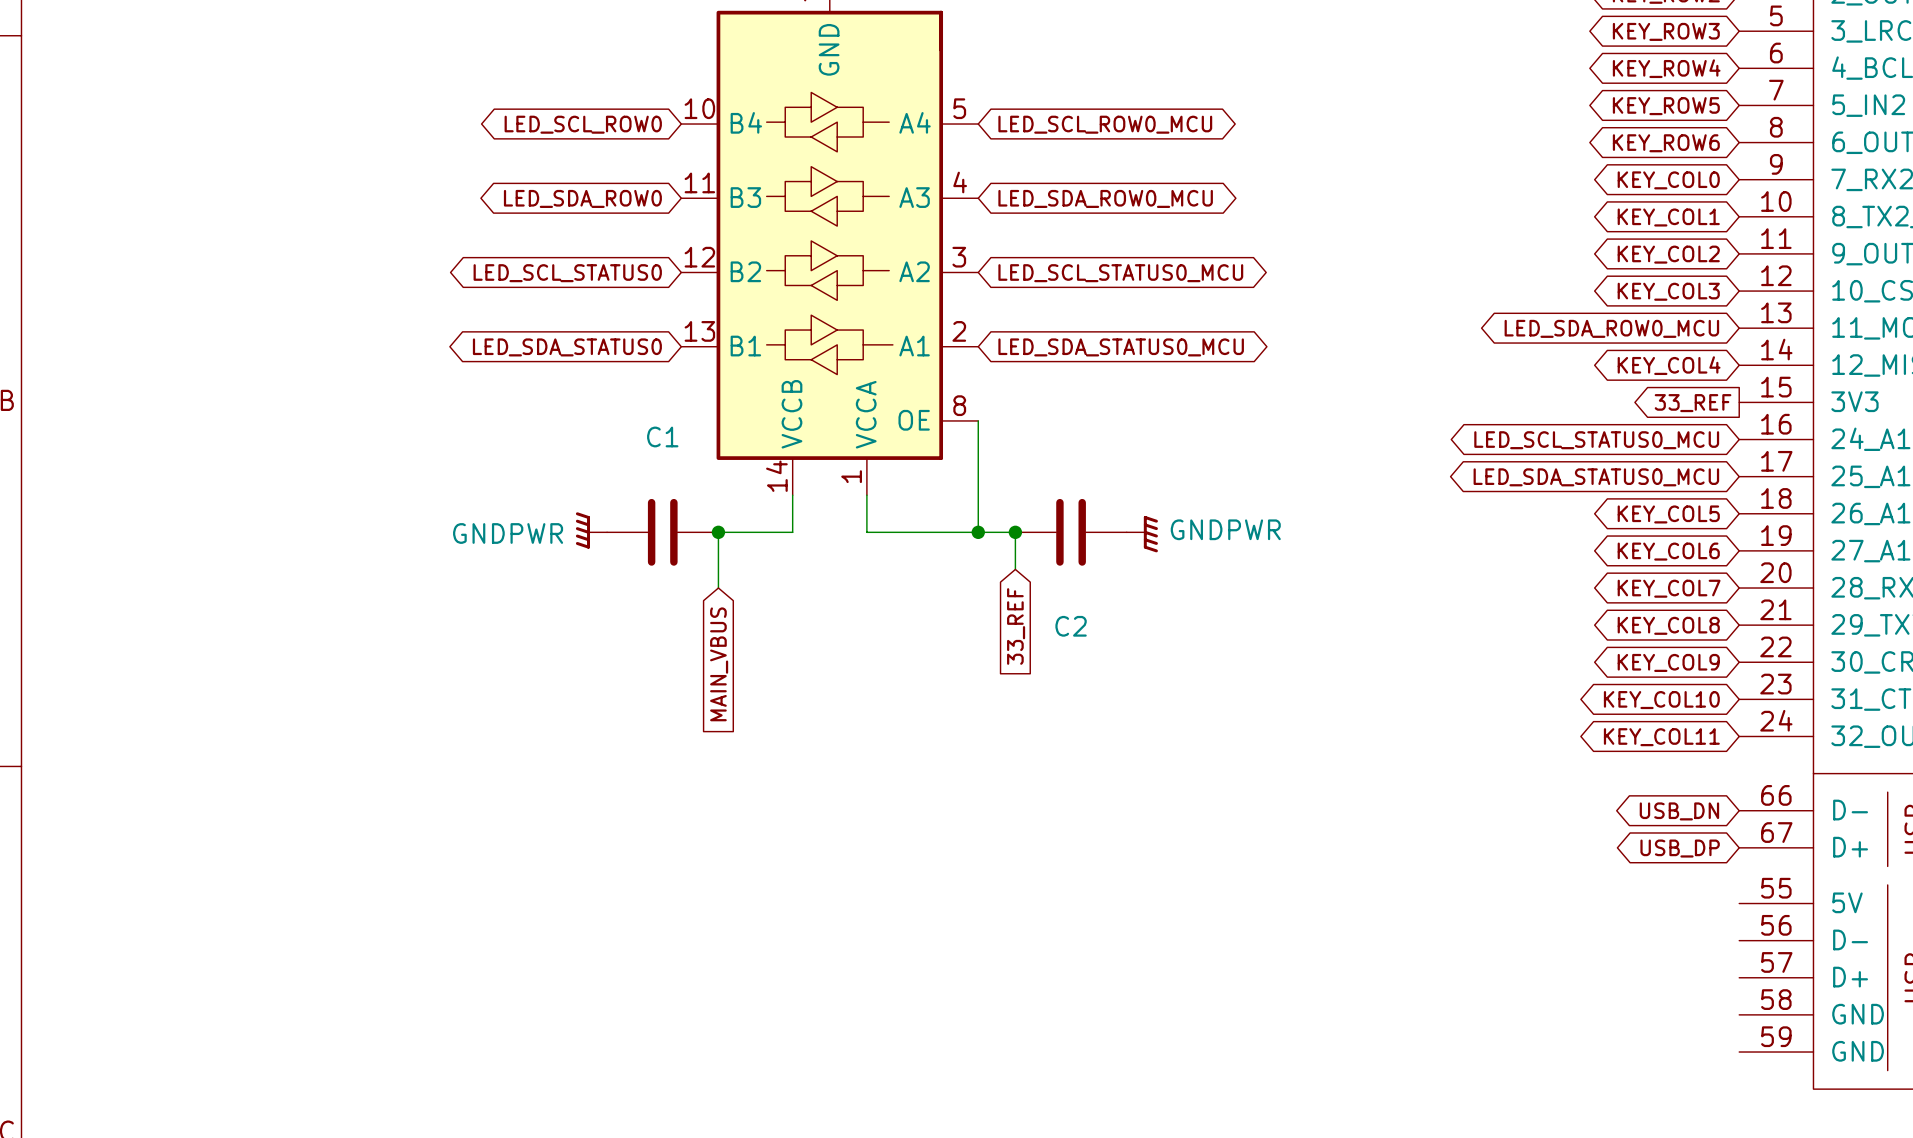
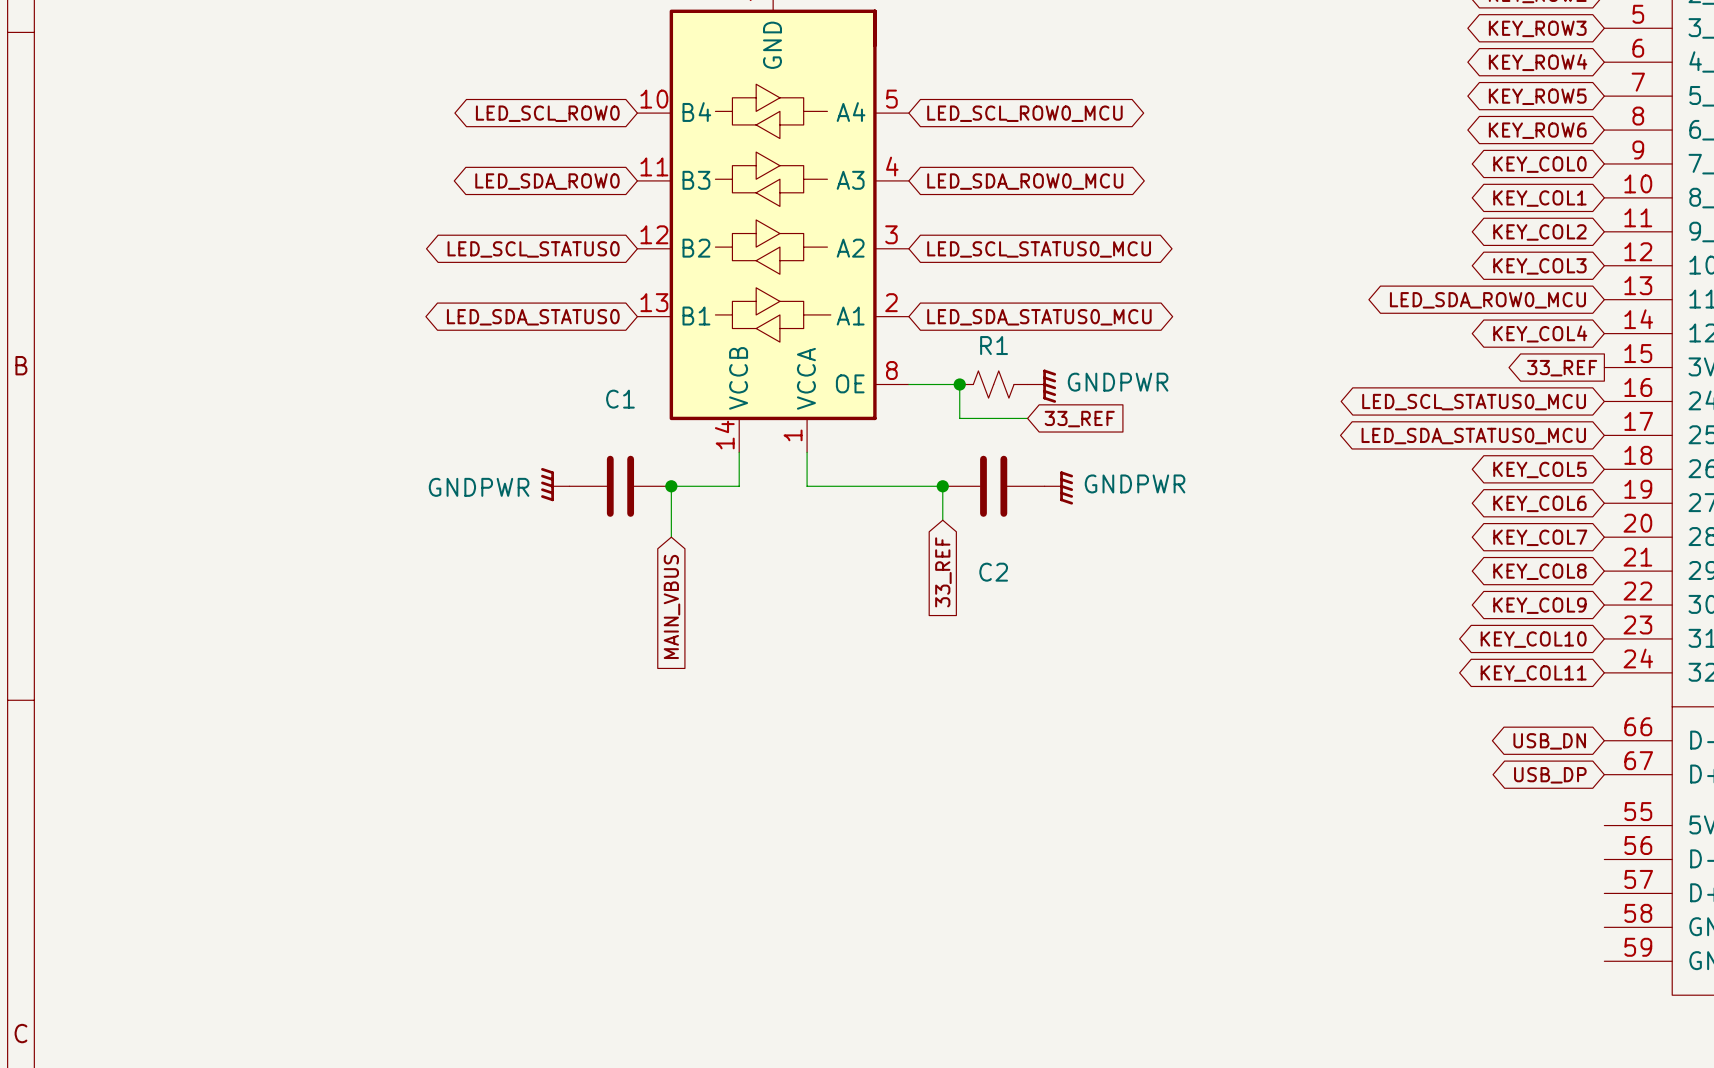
wire: (978, 420) (978, 532) -> (908, 384) (959, 384) (959, 418) (1027, 418)
junction: none -> (959, 384)
R1: none -> (993, 384)
power symbol: none -> GNDPWR (1041, 386)
global label: none -> 33_REF (1079, 419)
junction: (978, 532) -> none

